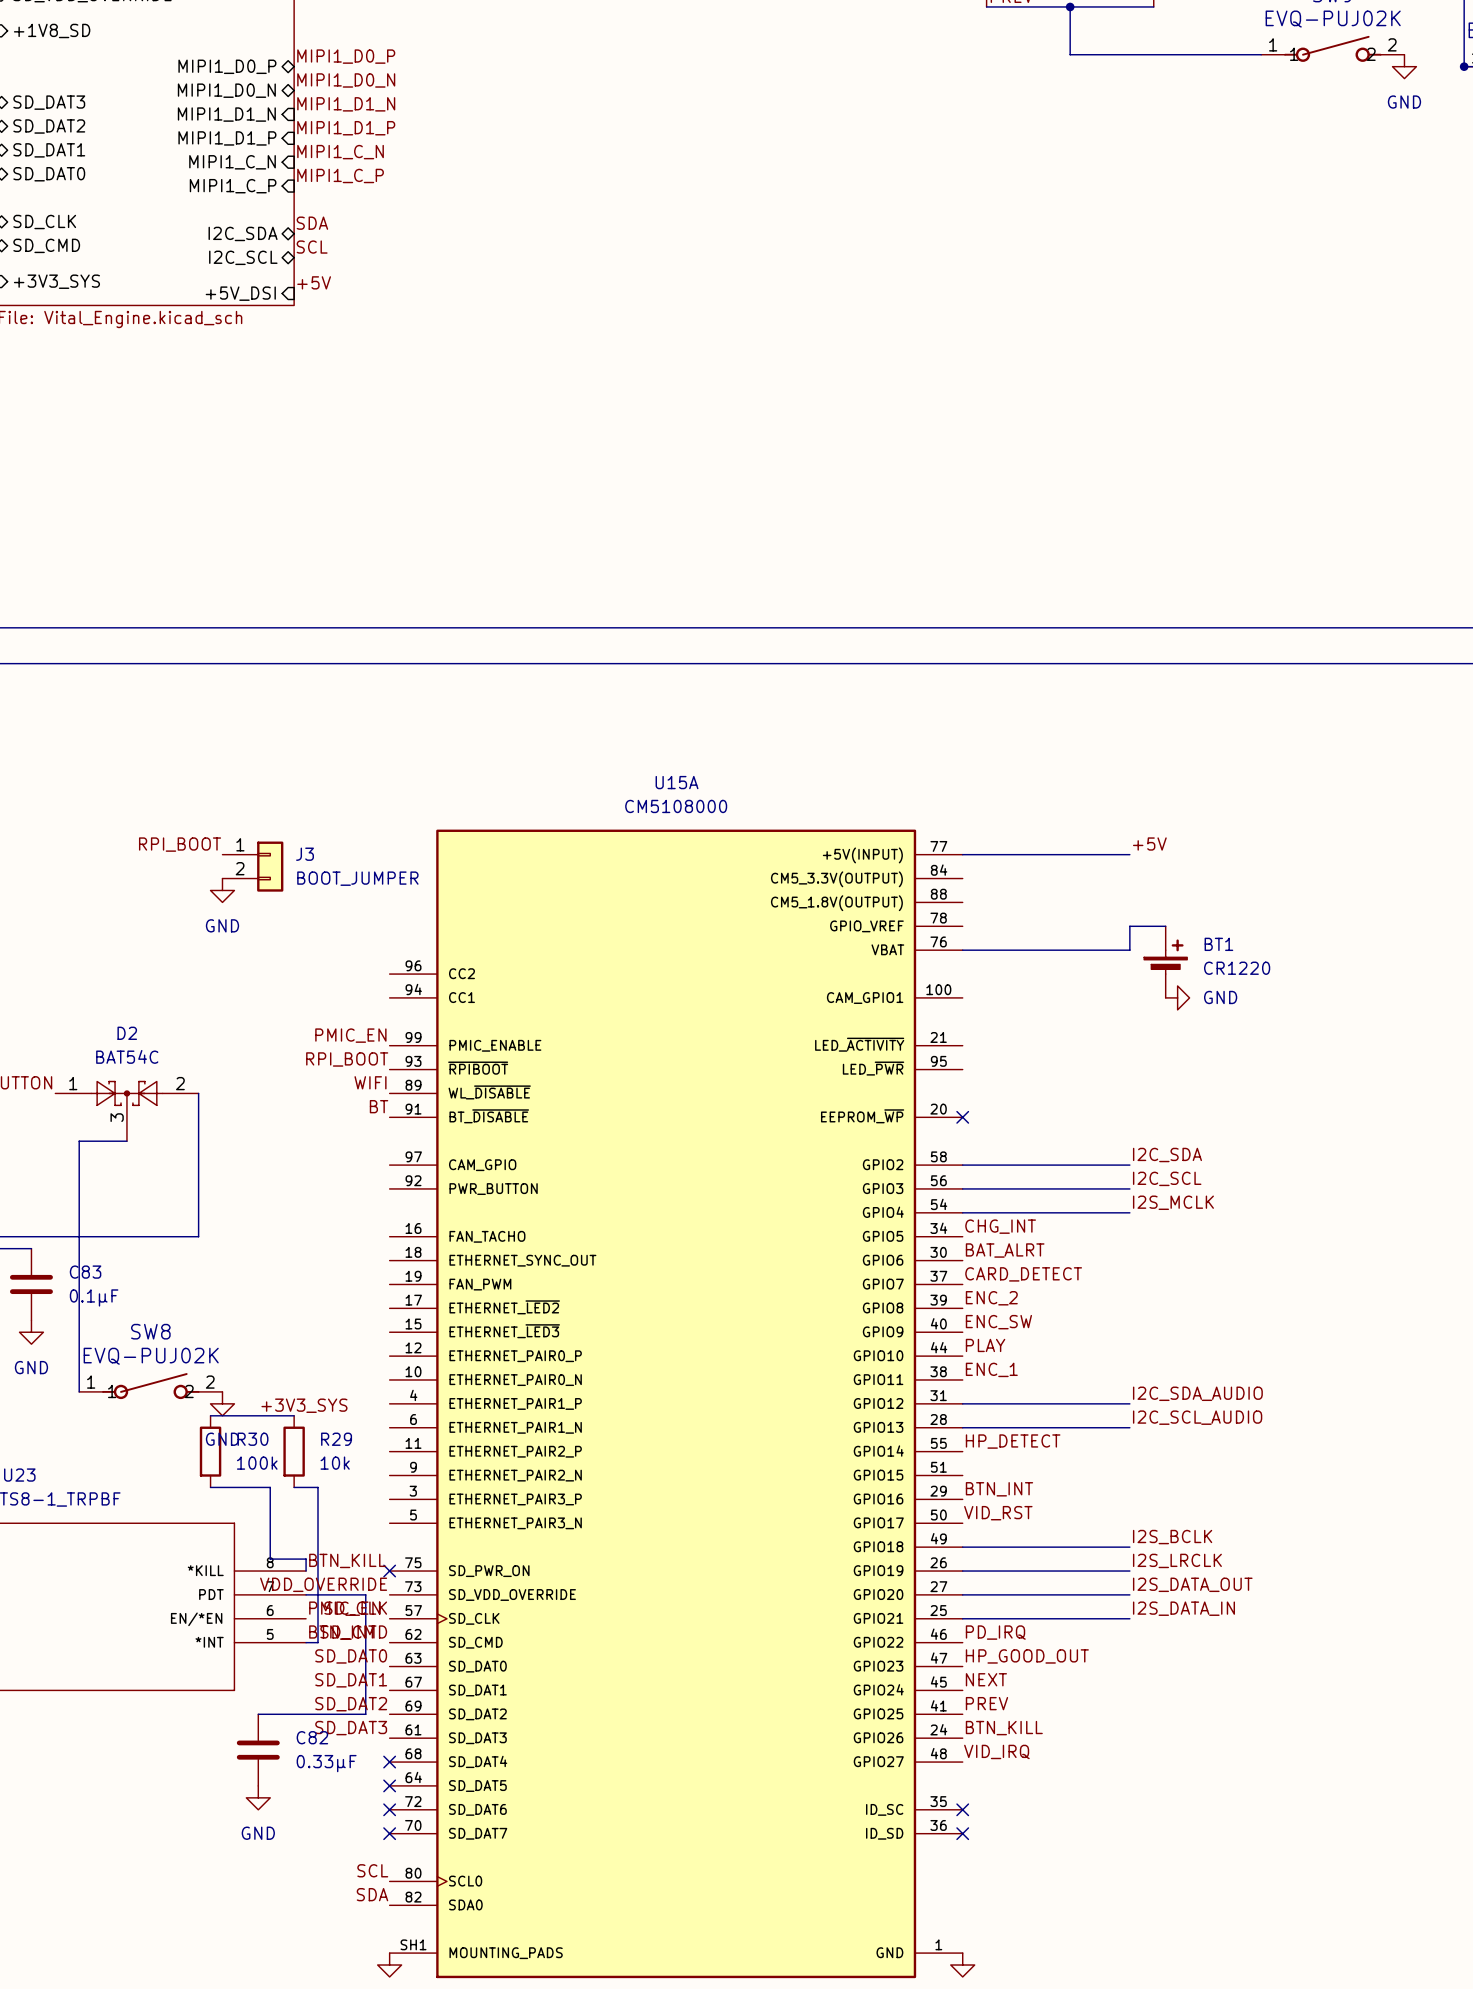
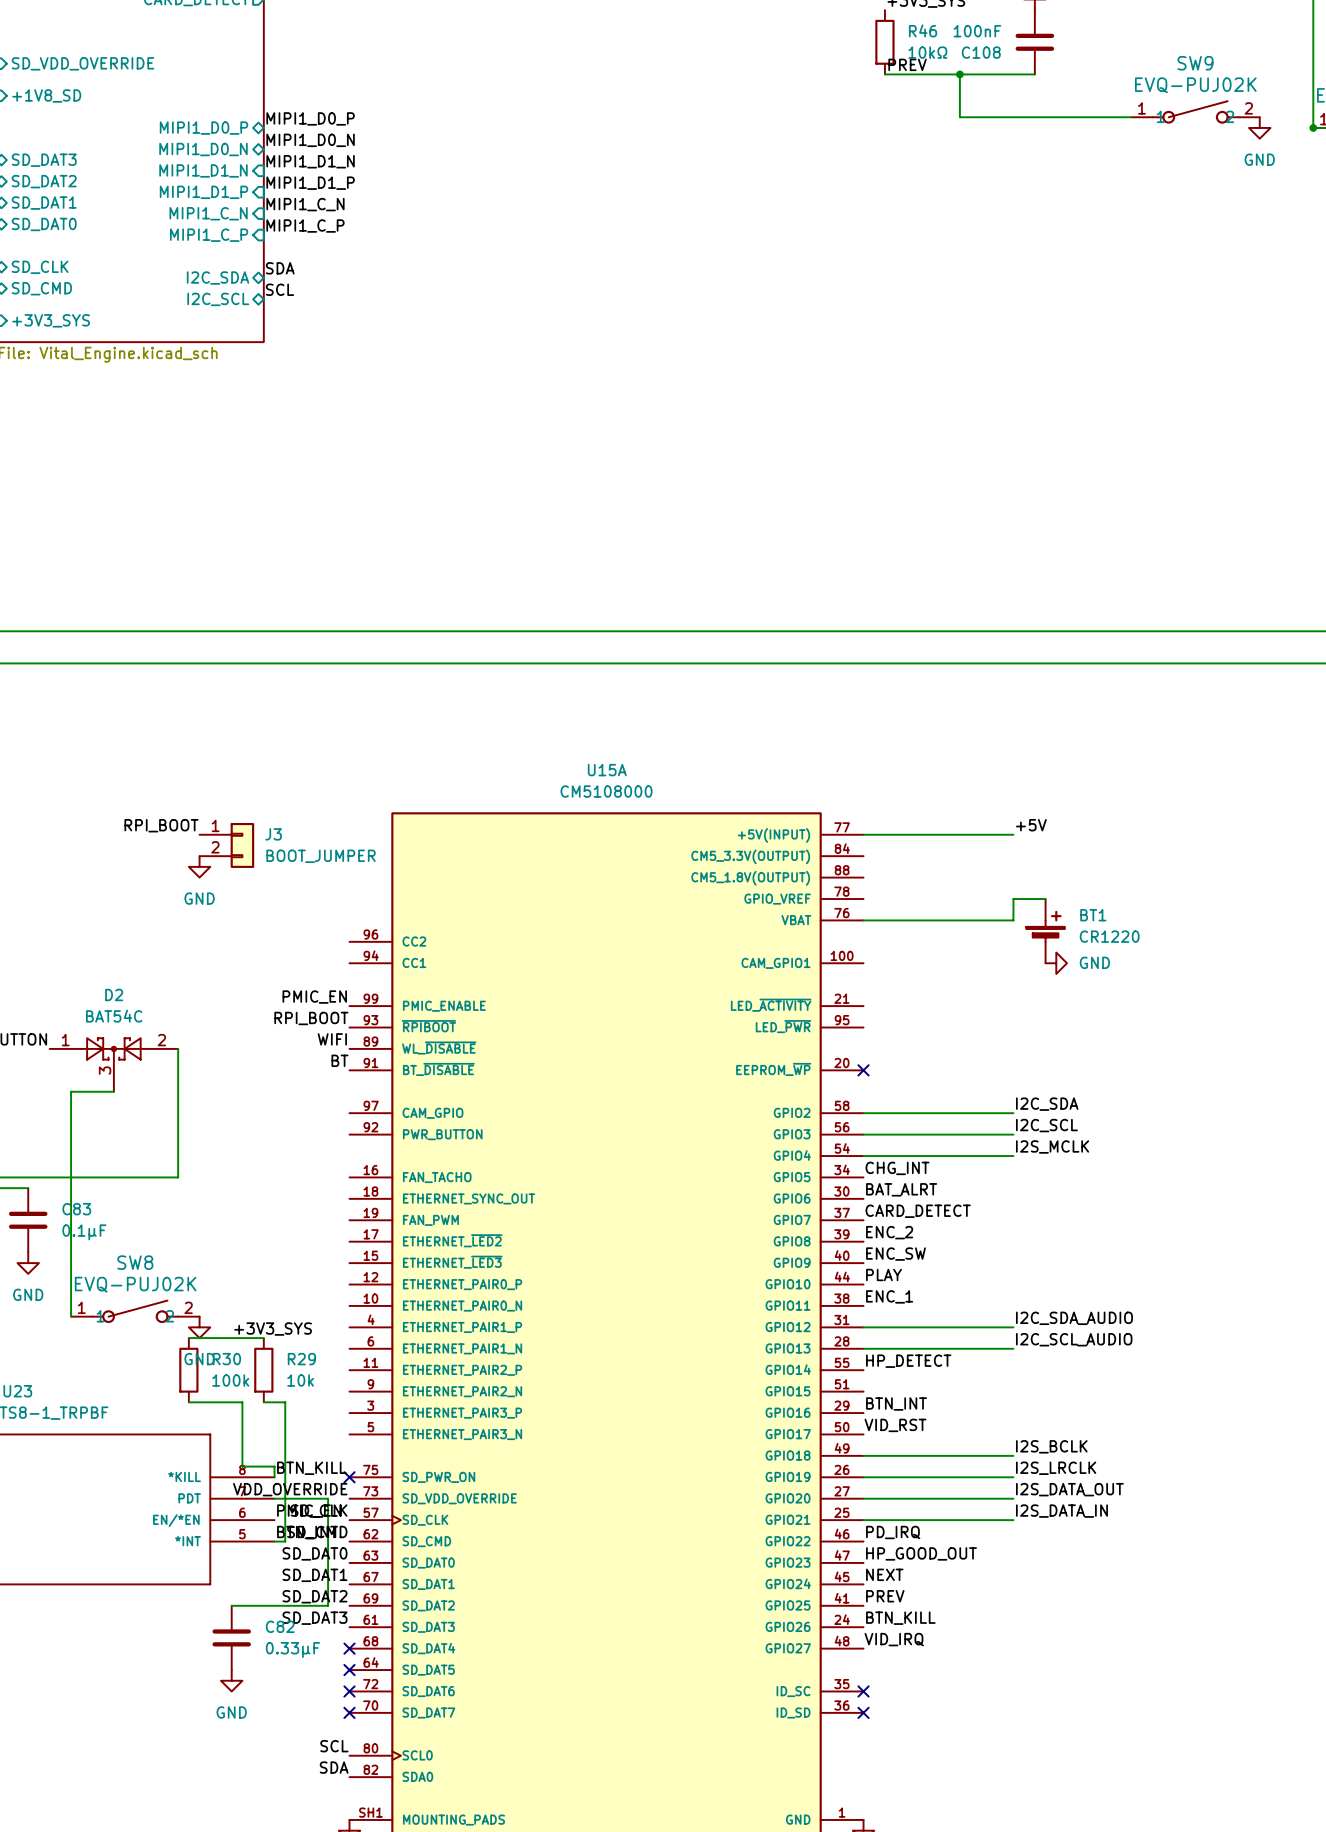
label: +5V (314, 282) -> none
sheet pin: +5V_DSI (240, 293) -> none

